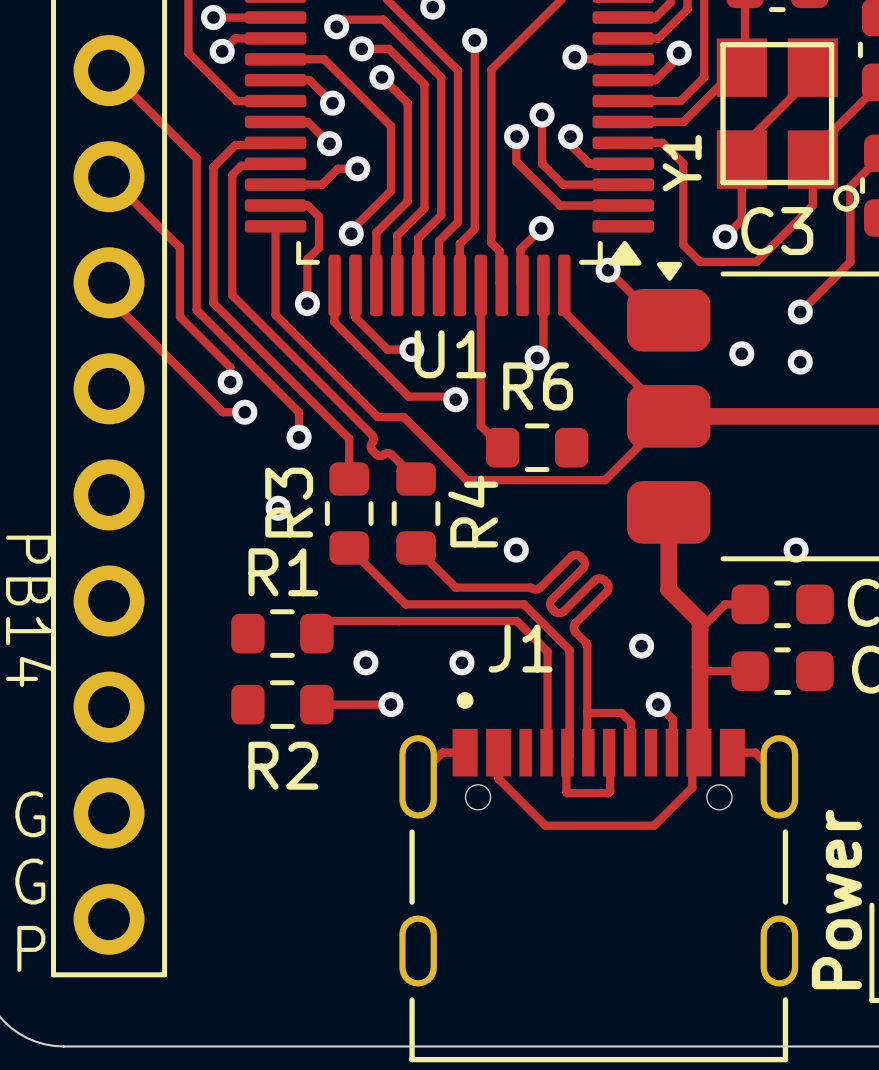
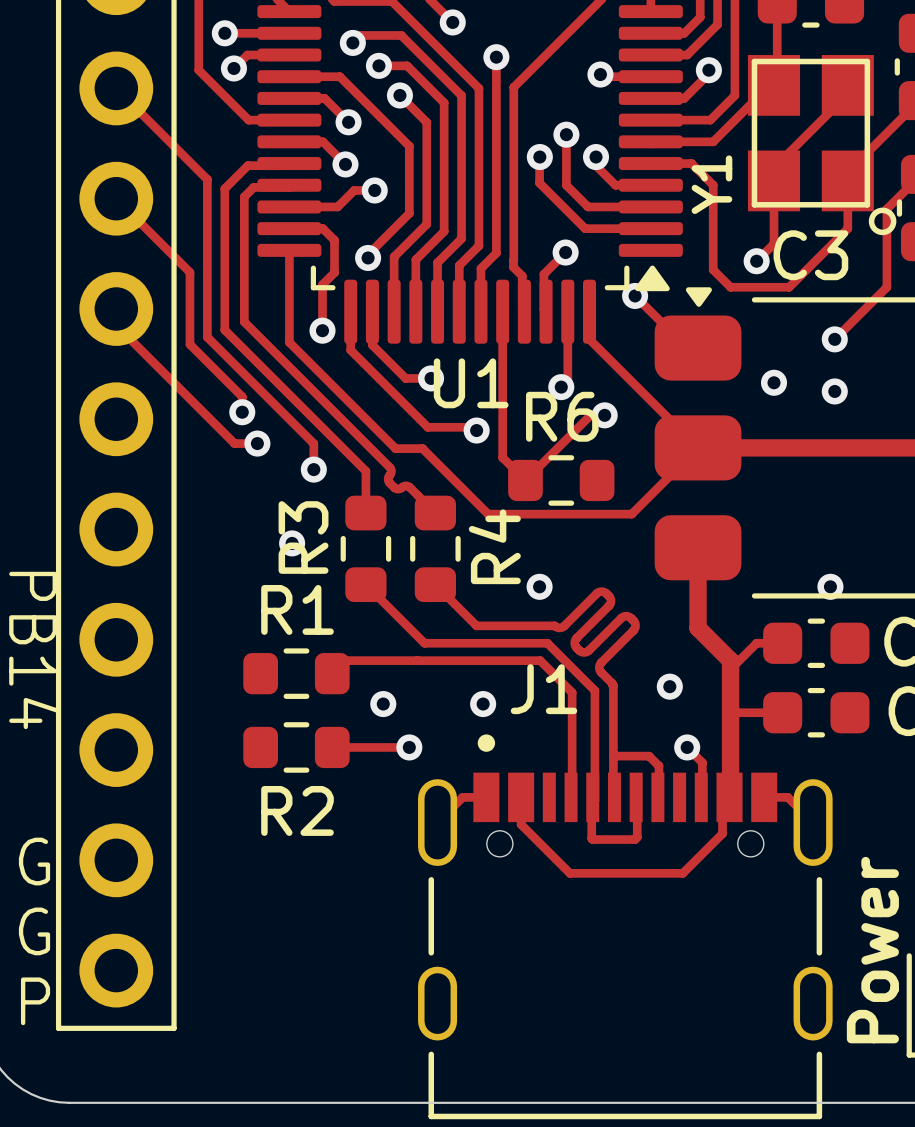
track: none -> (604, 415) (590, 415) (525, 480)
via: none -> (604, 415)

